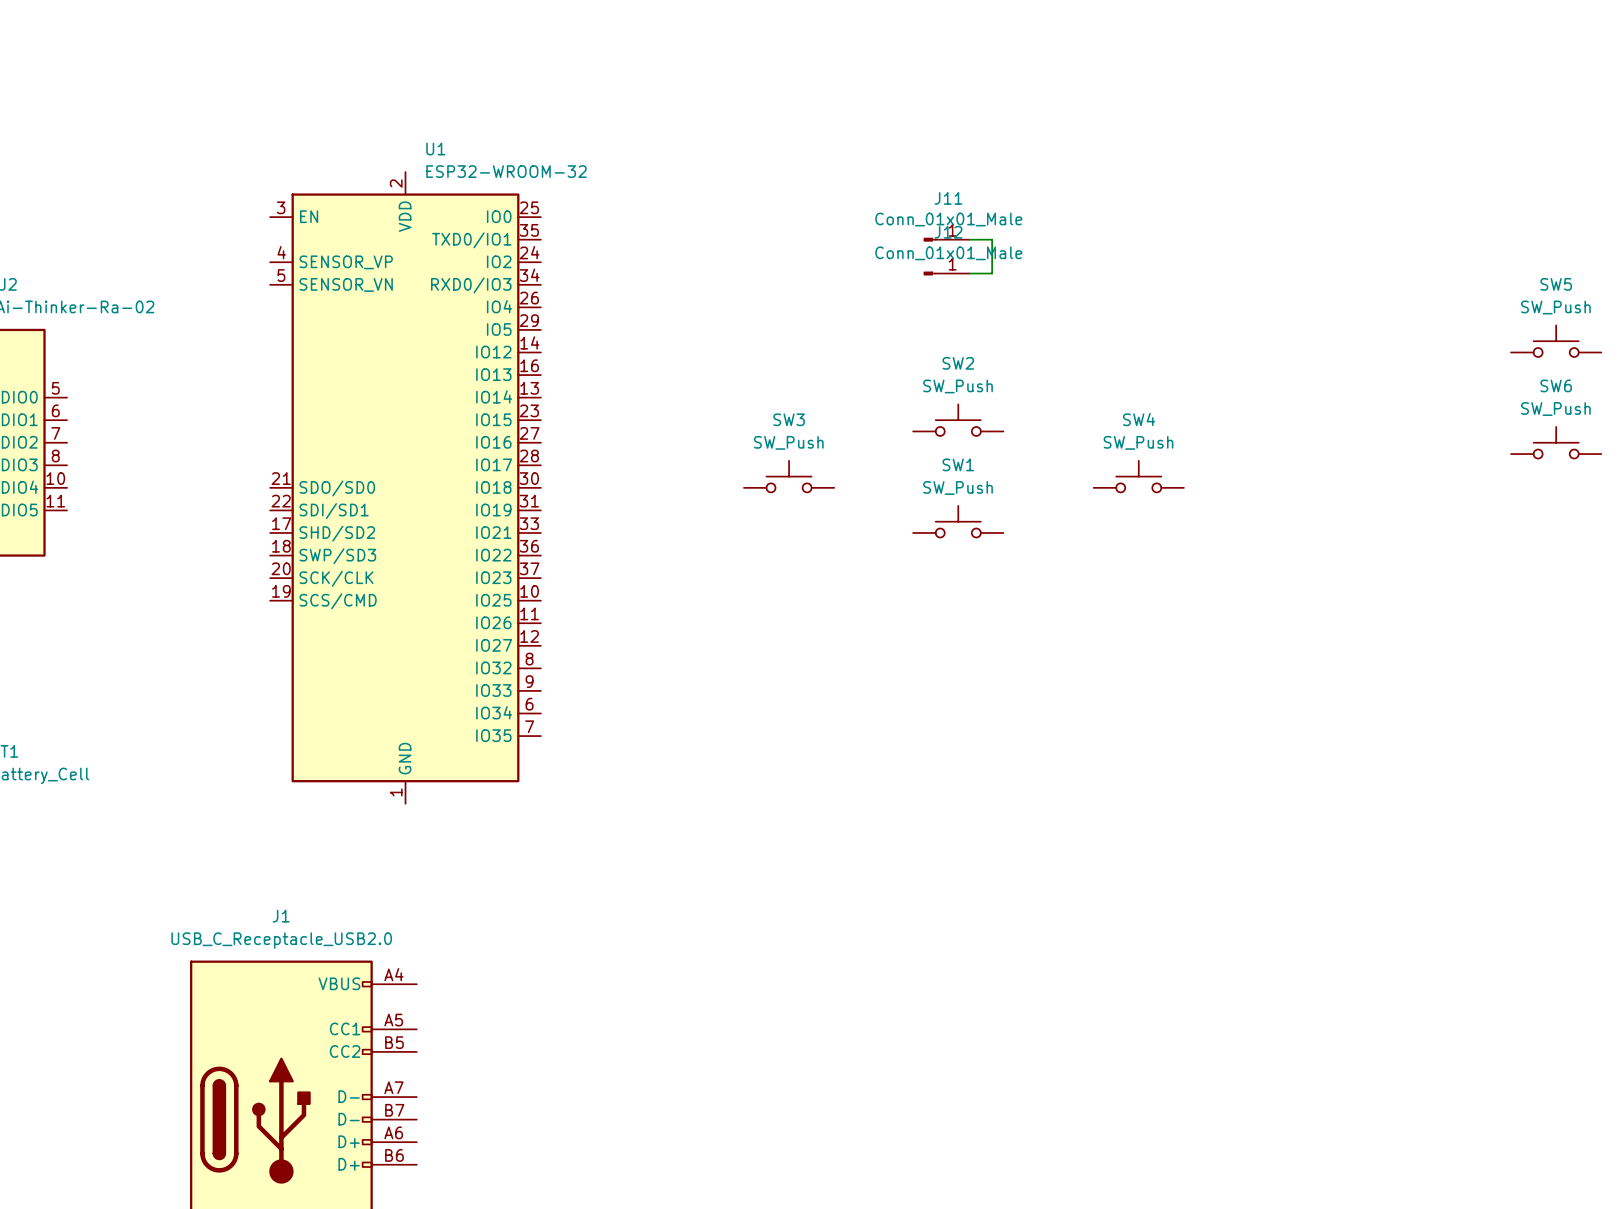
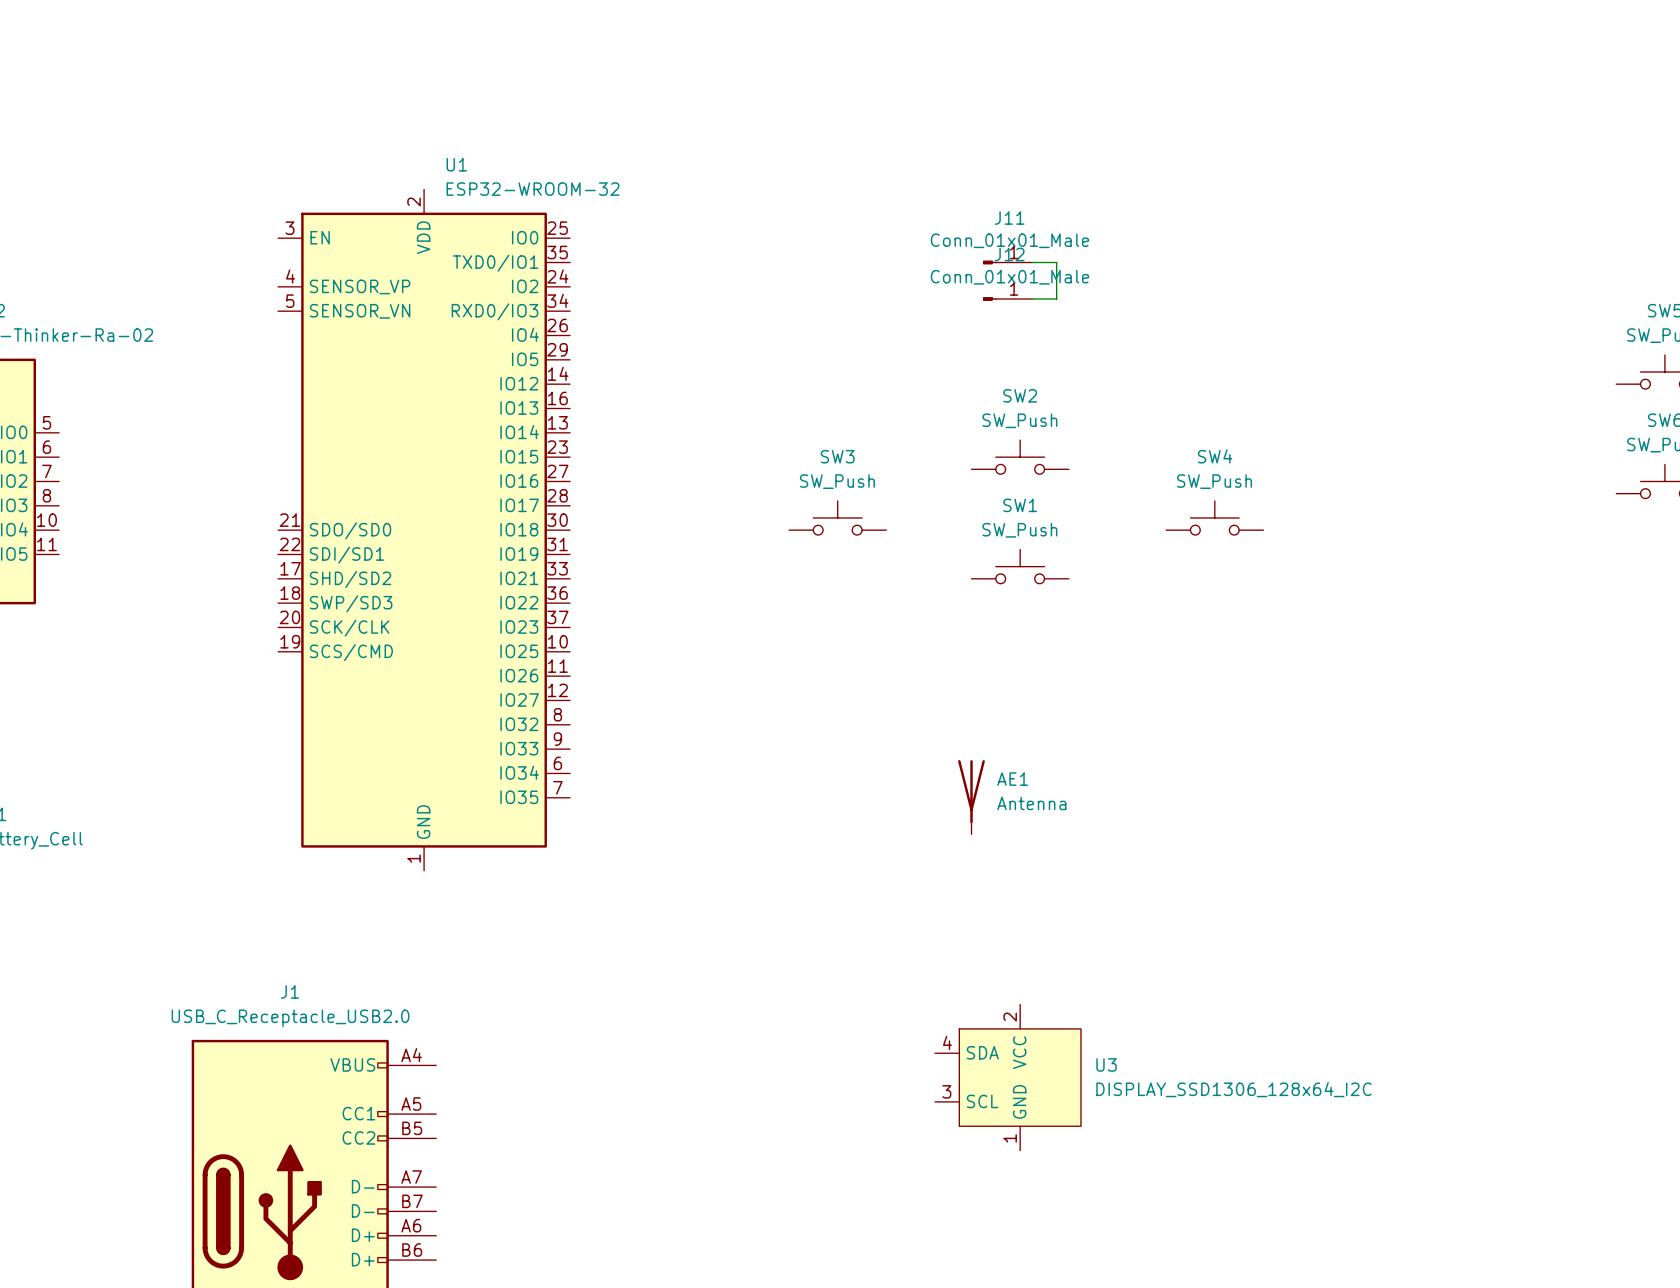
AE1: none -> Antenna (971, 797)
U3: none -> DISPLAY_SSD1306_128x64_I2C (1007, 1077)

